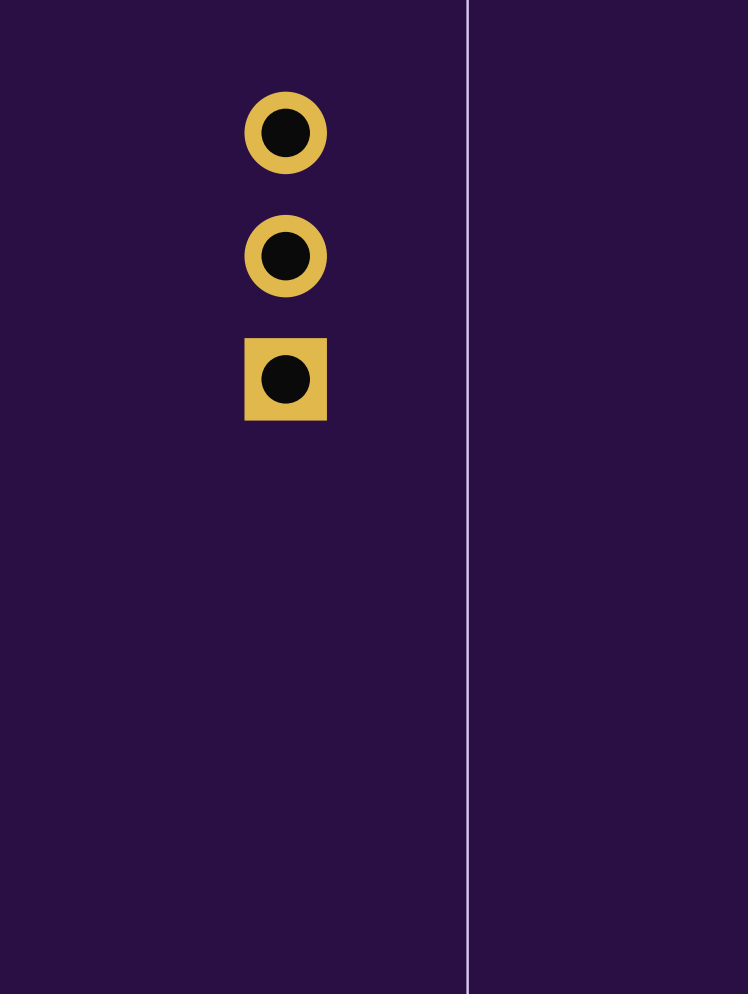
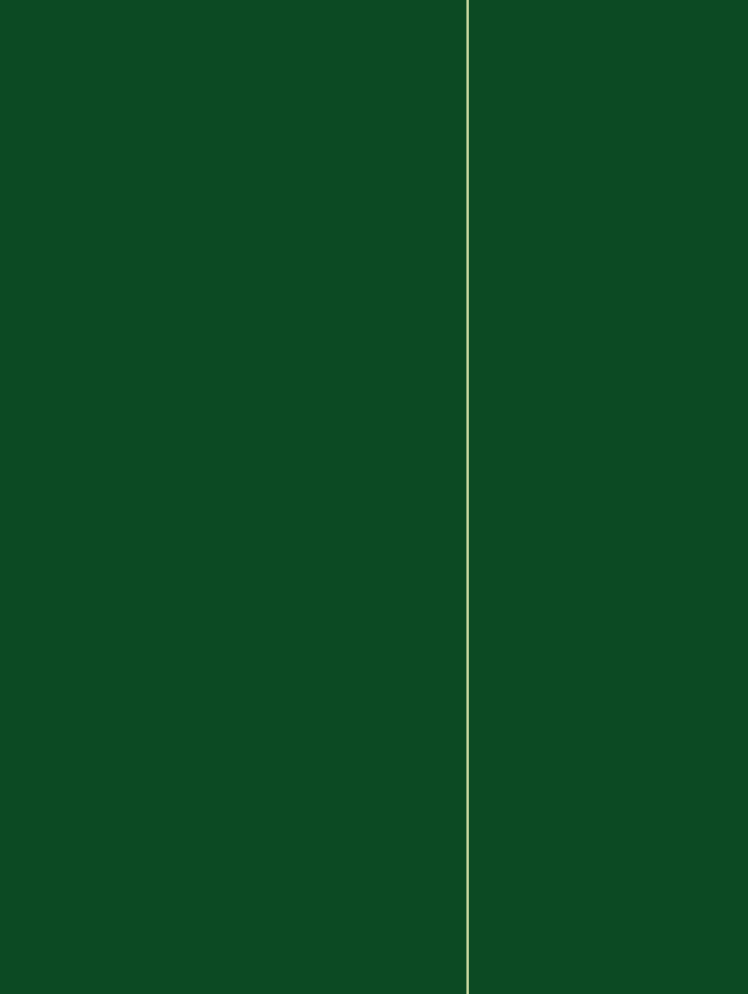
part: (285, 256) -> none

